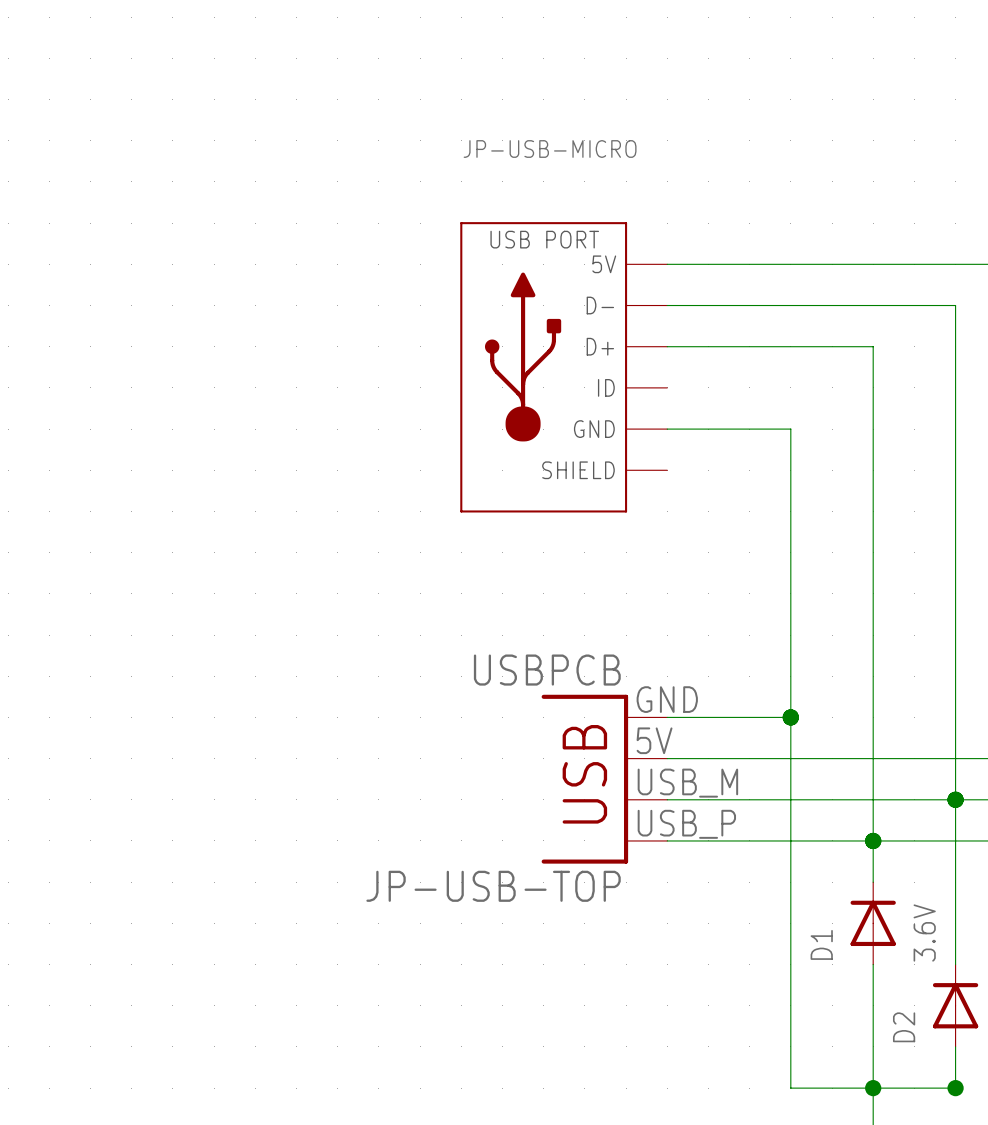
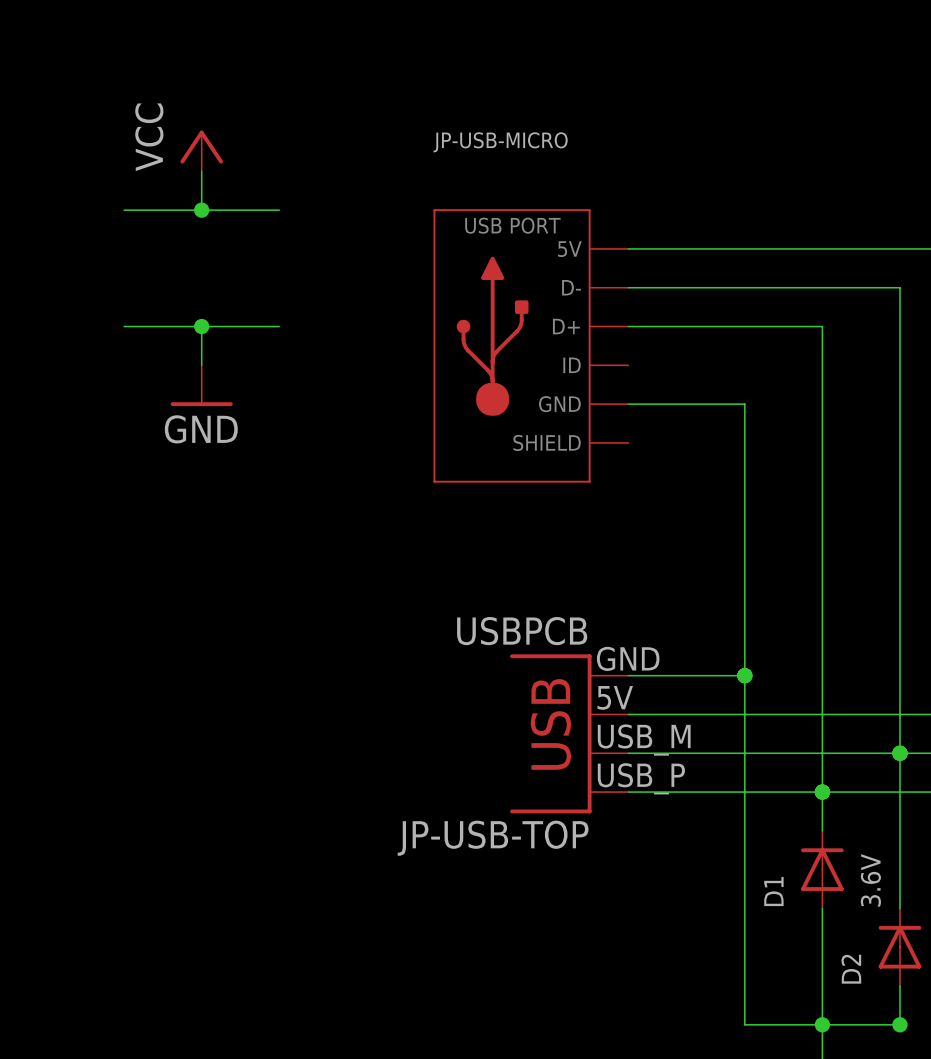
power symbol: none -> VCC (201, 151)
wire: none -> (201, 171) (201, 210)
wire: none -> (124, 210) (279, 210)
junction: none -> (201, 210)
wire: none -> (124, 326) (279, 326)
wire: none -> (201, 326) (201, 365)
junction: none -> (201, 326)
power symbol: none -> GND (201, 385)

